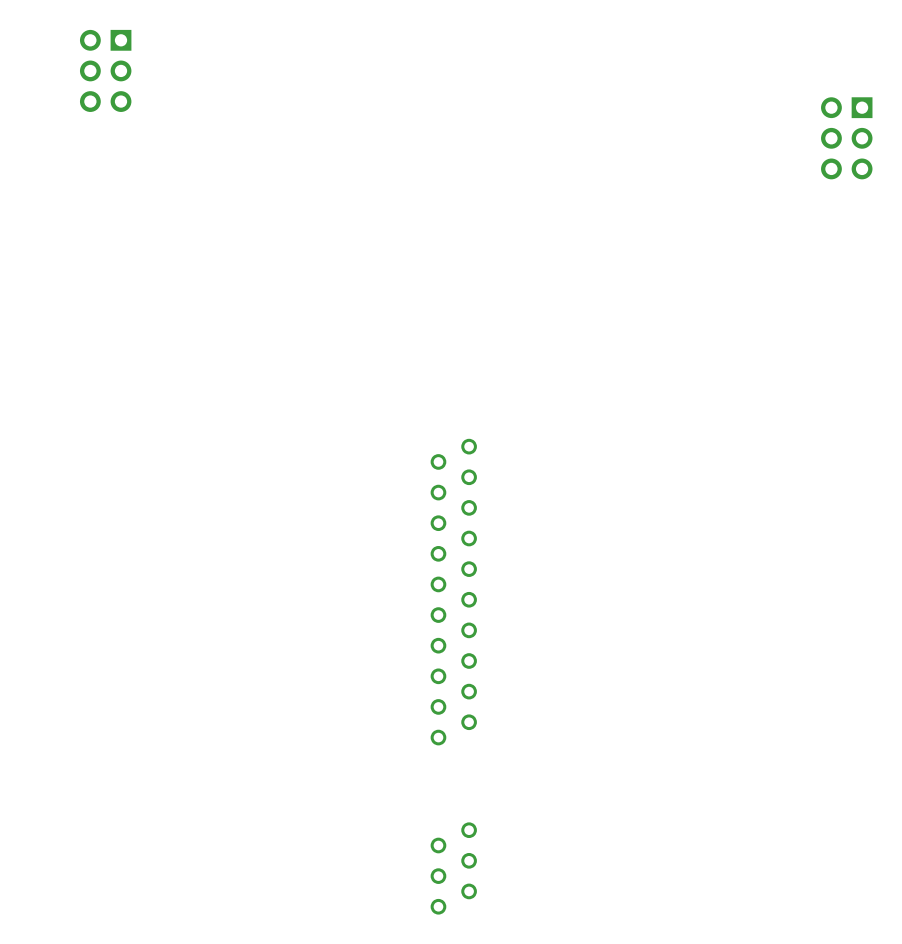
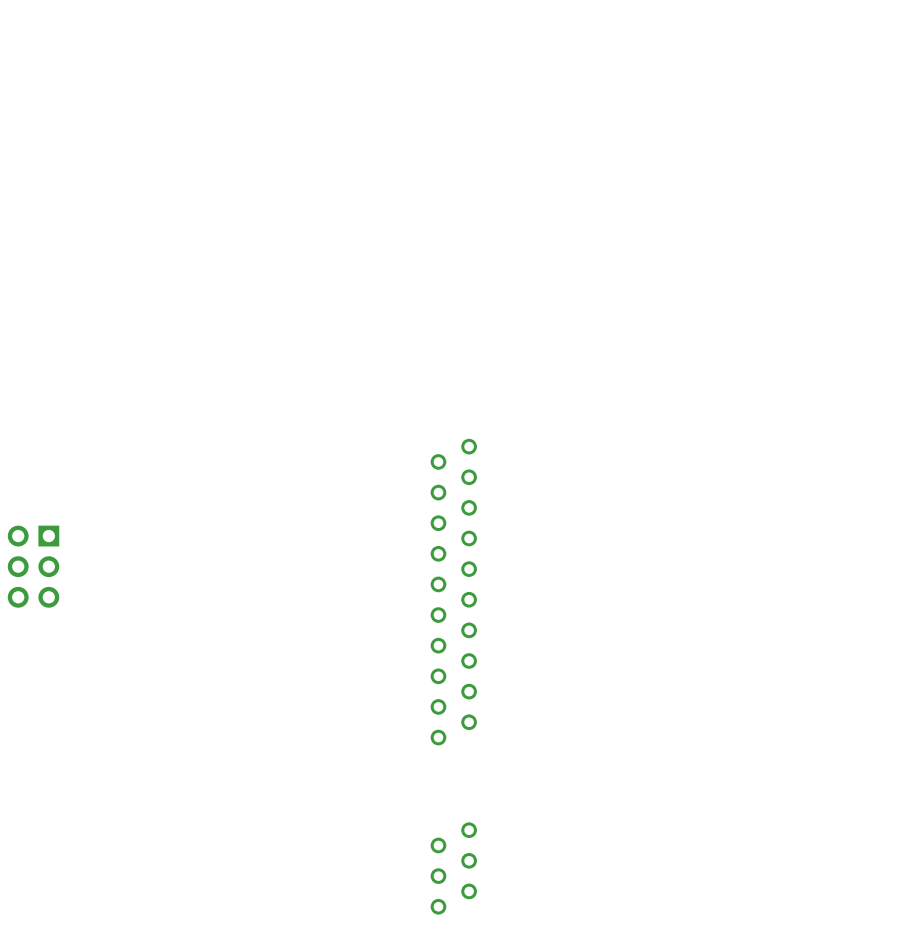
part: (105, 70) -> none
part: (846, 138) -> none
part: none -> (33, 566)

